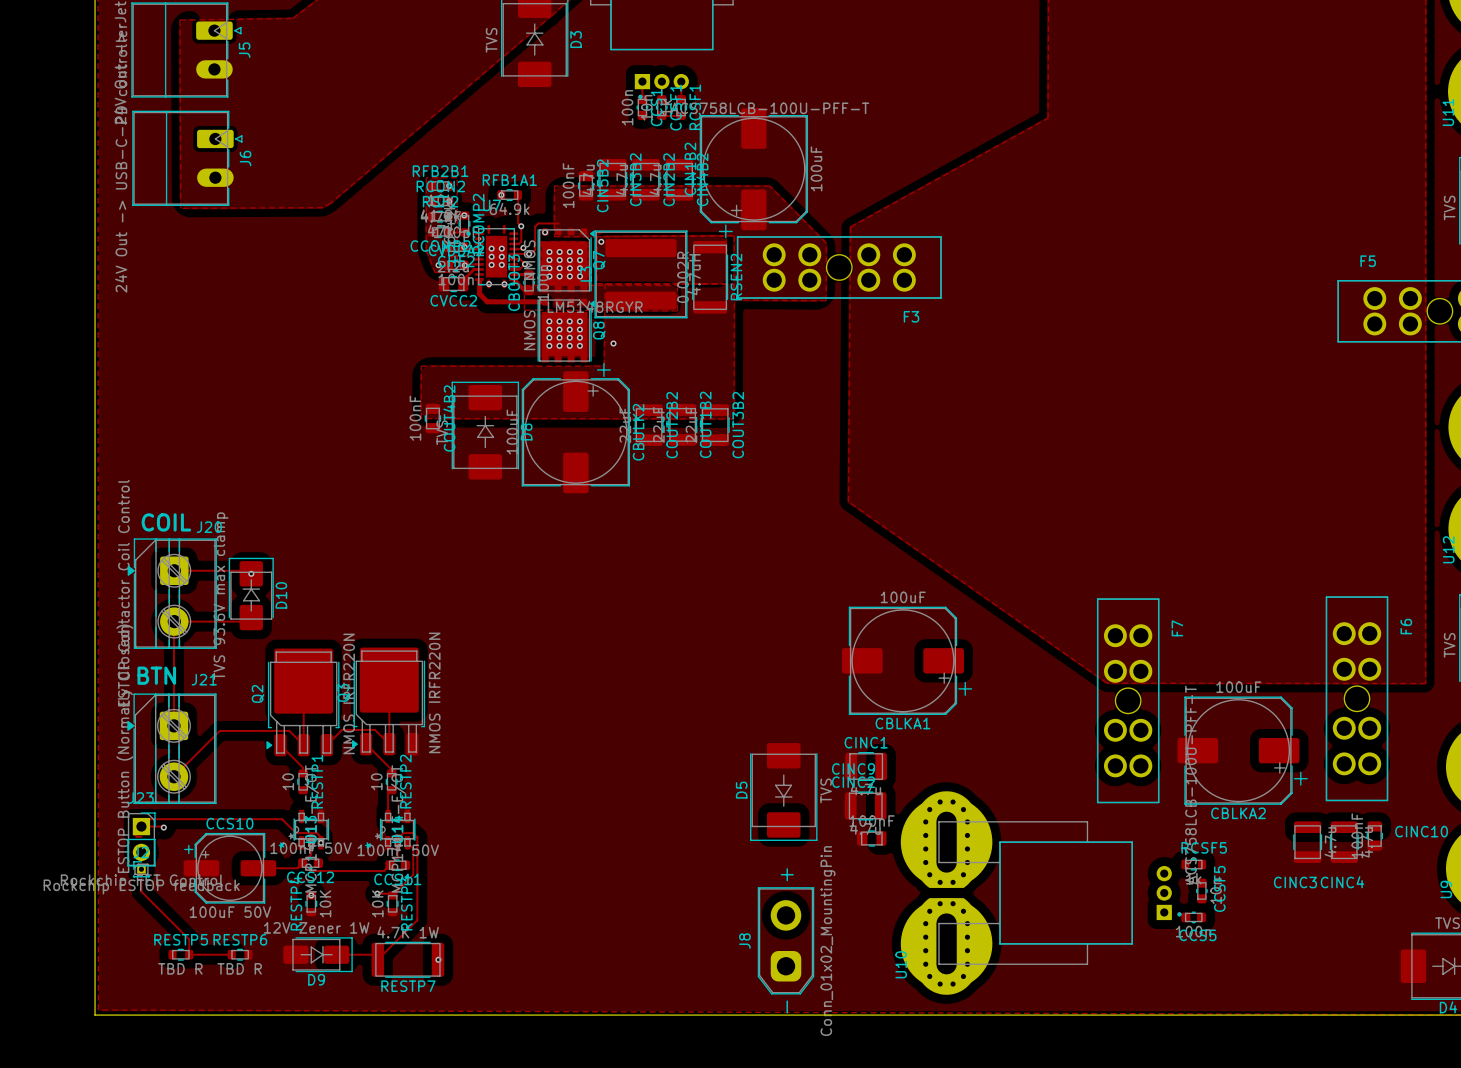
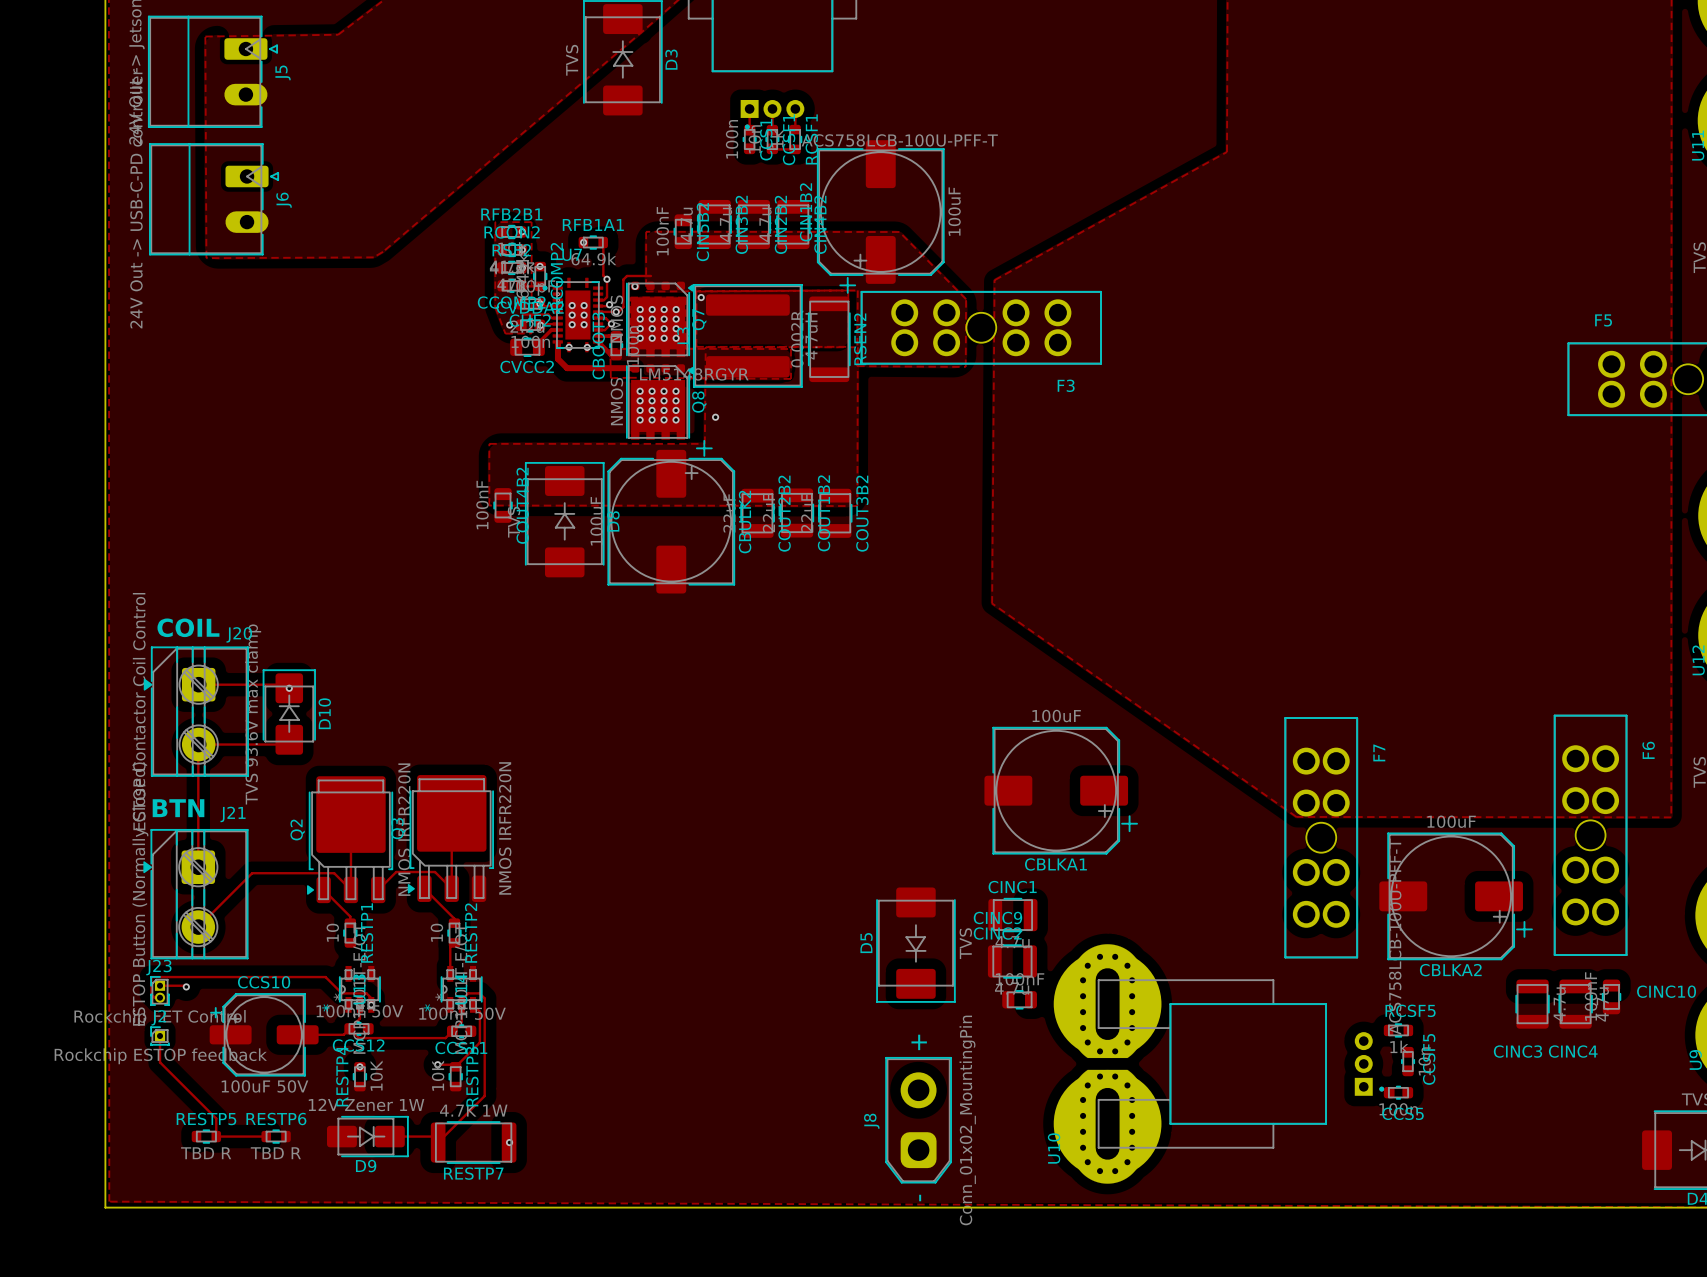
J23 footprint: [127, 812, 156, 867] -> [150, 976, 170, 1006]

